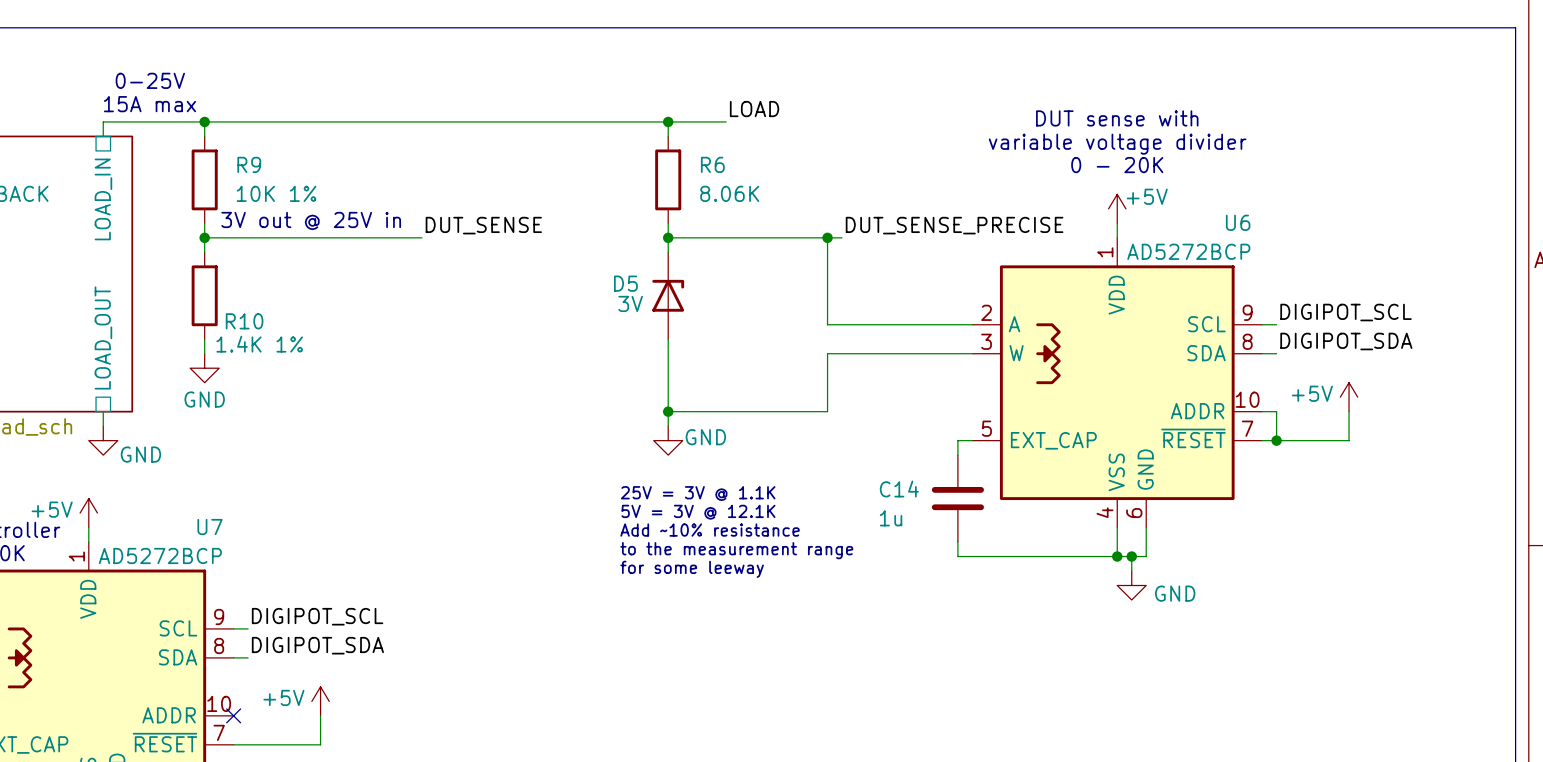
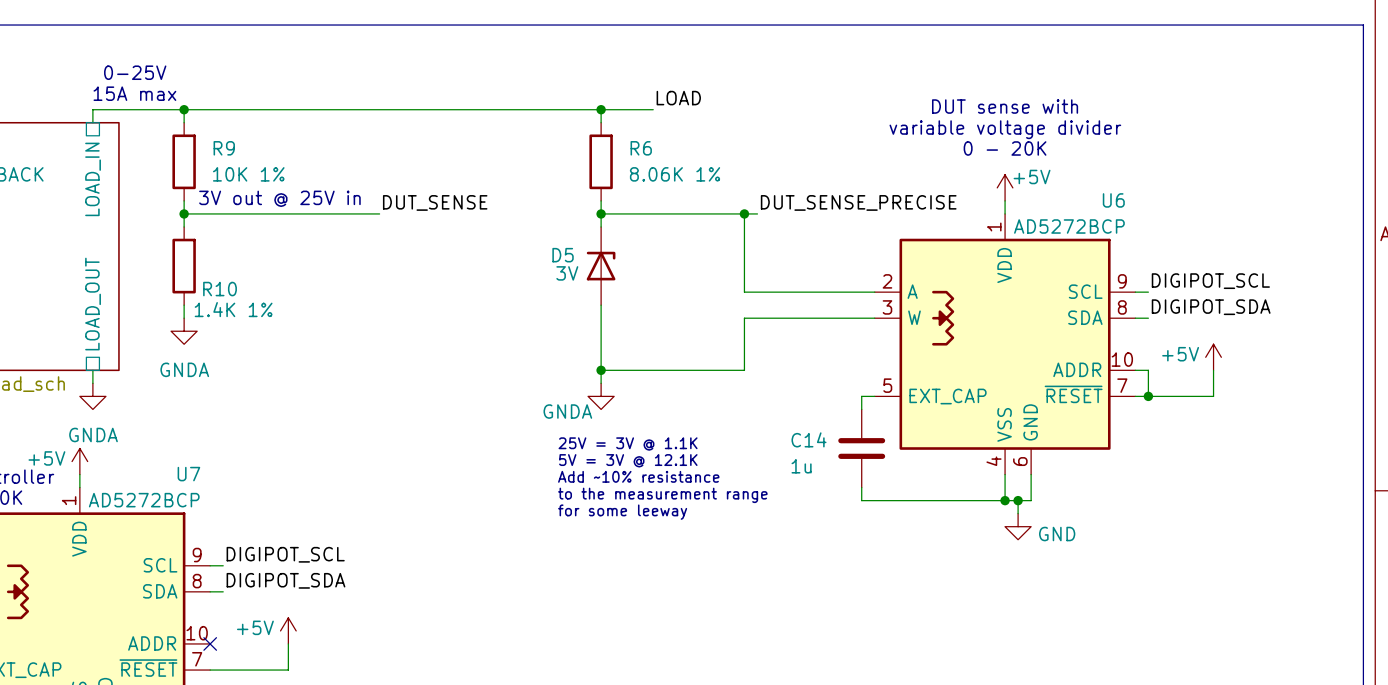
R6 value: 8.06K (729, 193) -> 8.06K 1% (675, 174)
power symbol: GND (204, 368) -> GNDA (184, 331)
power symbol: GND (103, 440) -> GNDA (92, 396)
power symbol: GND (668, 440) -> GNDA (601, 396)

